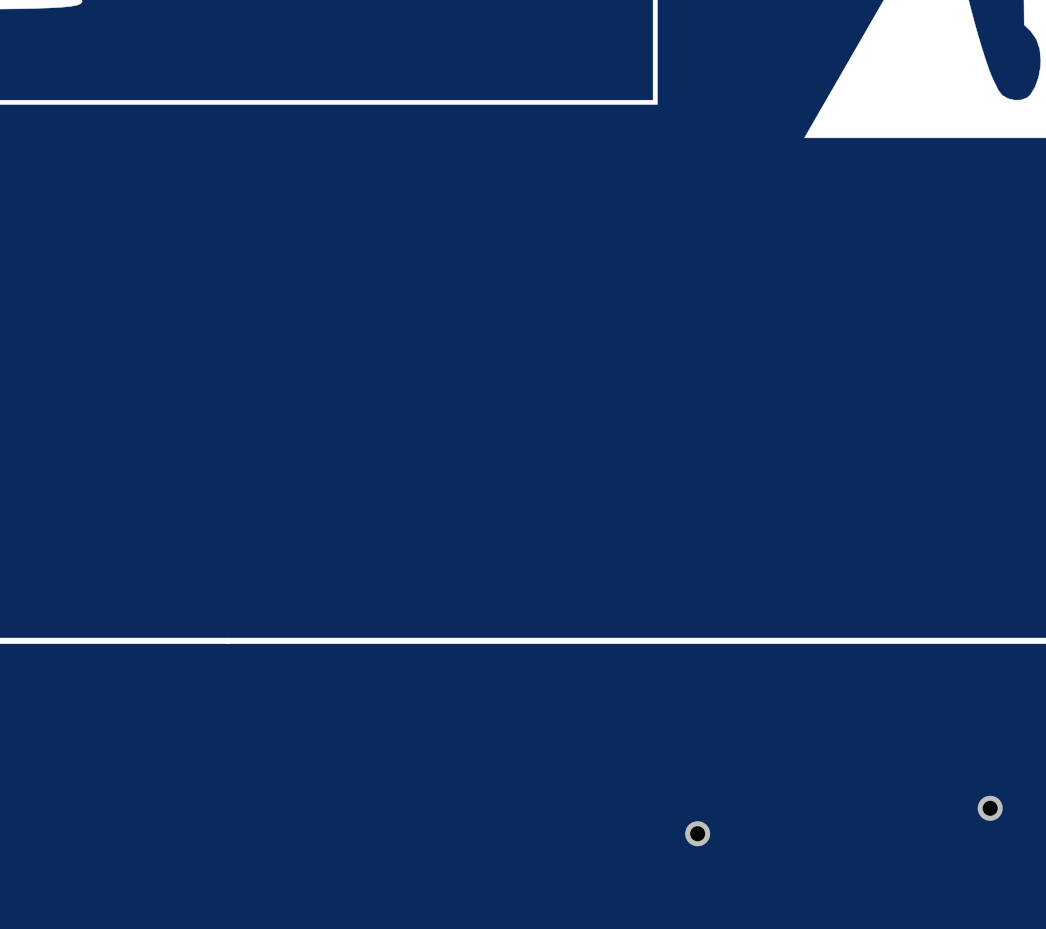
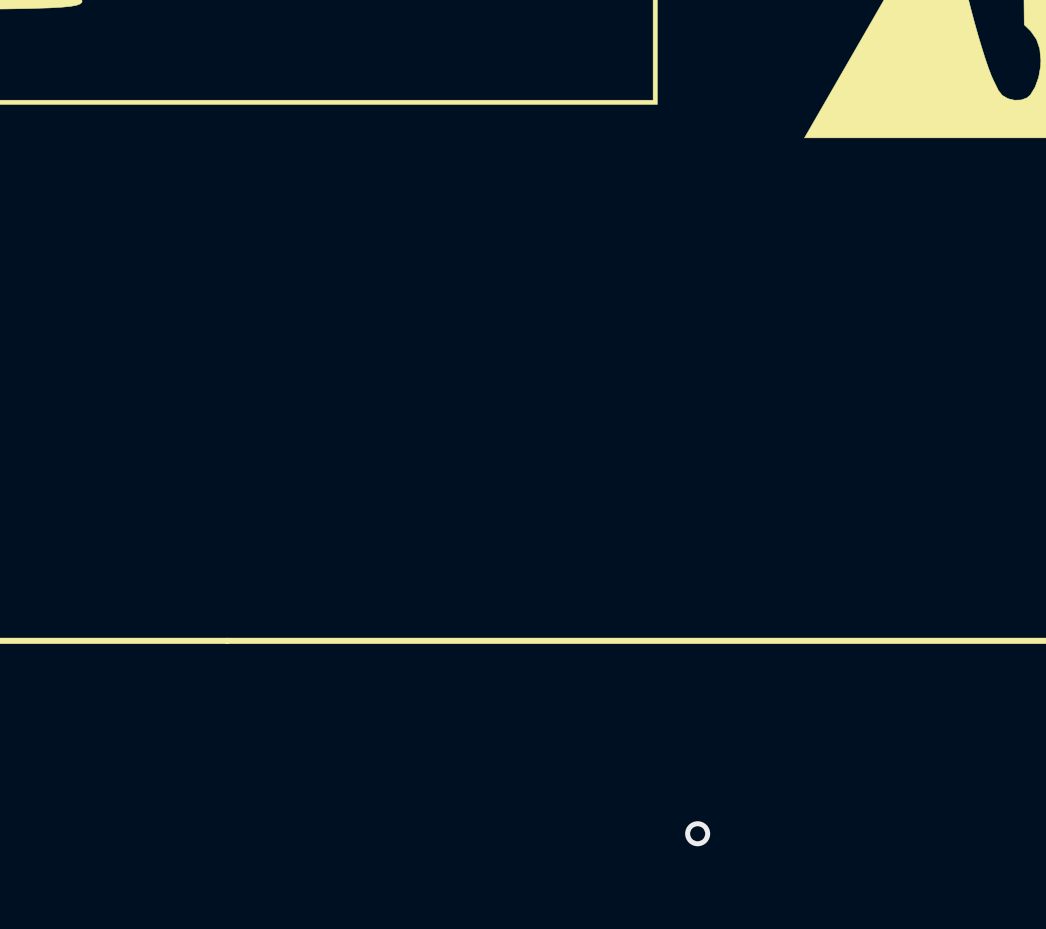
via: (990, 808) -> none

